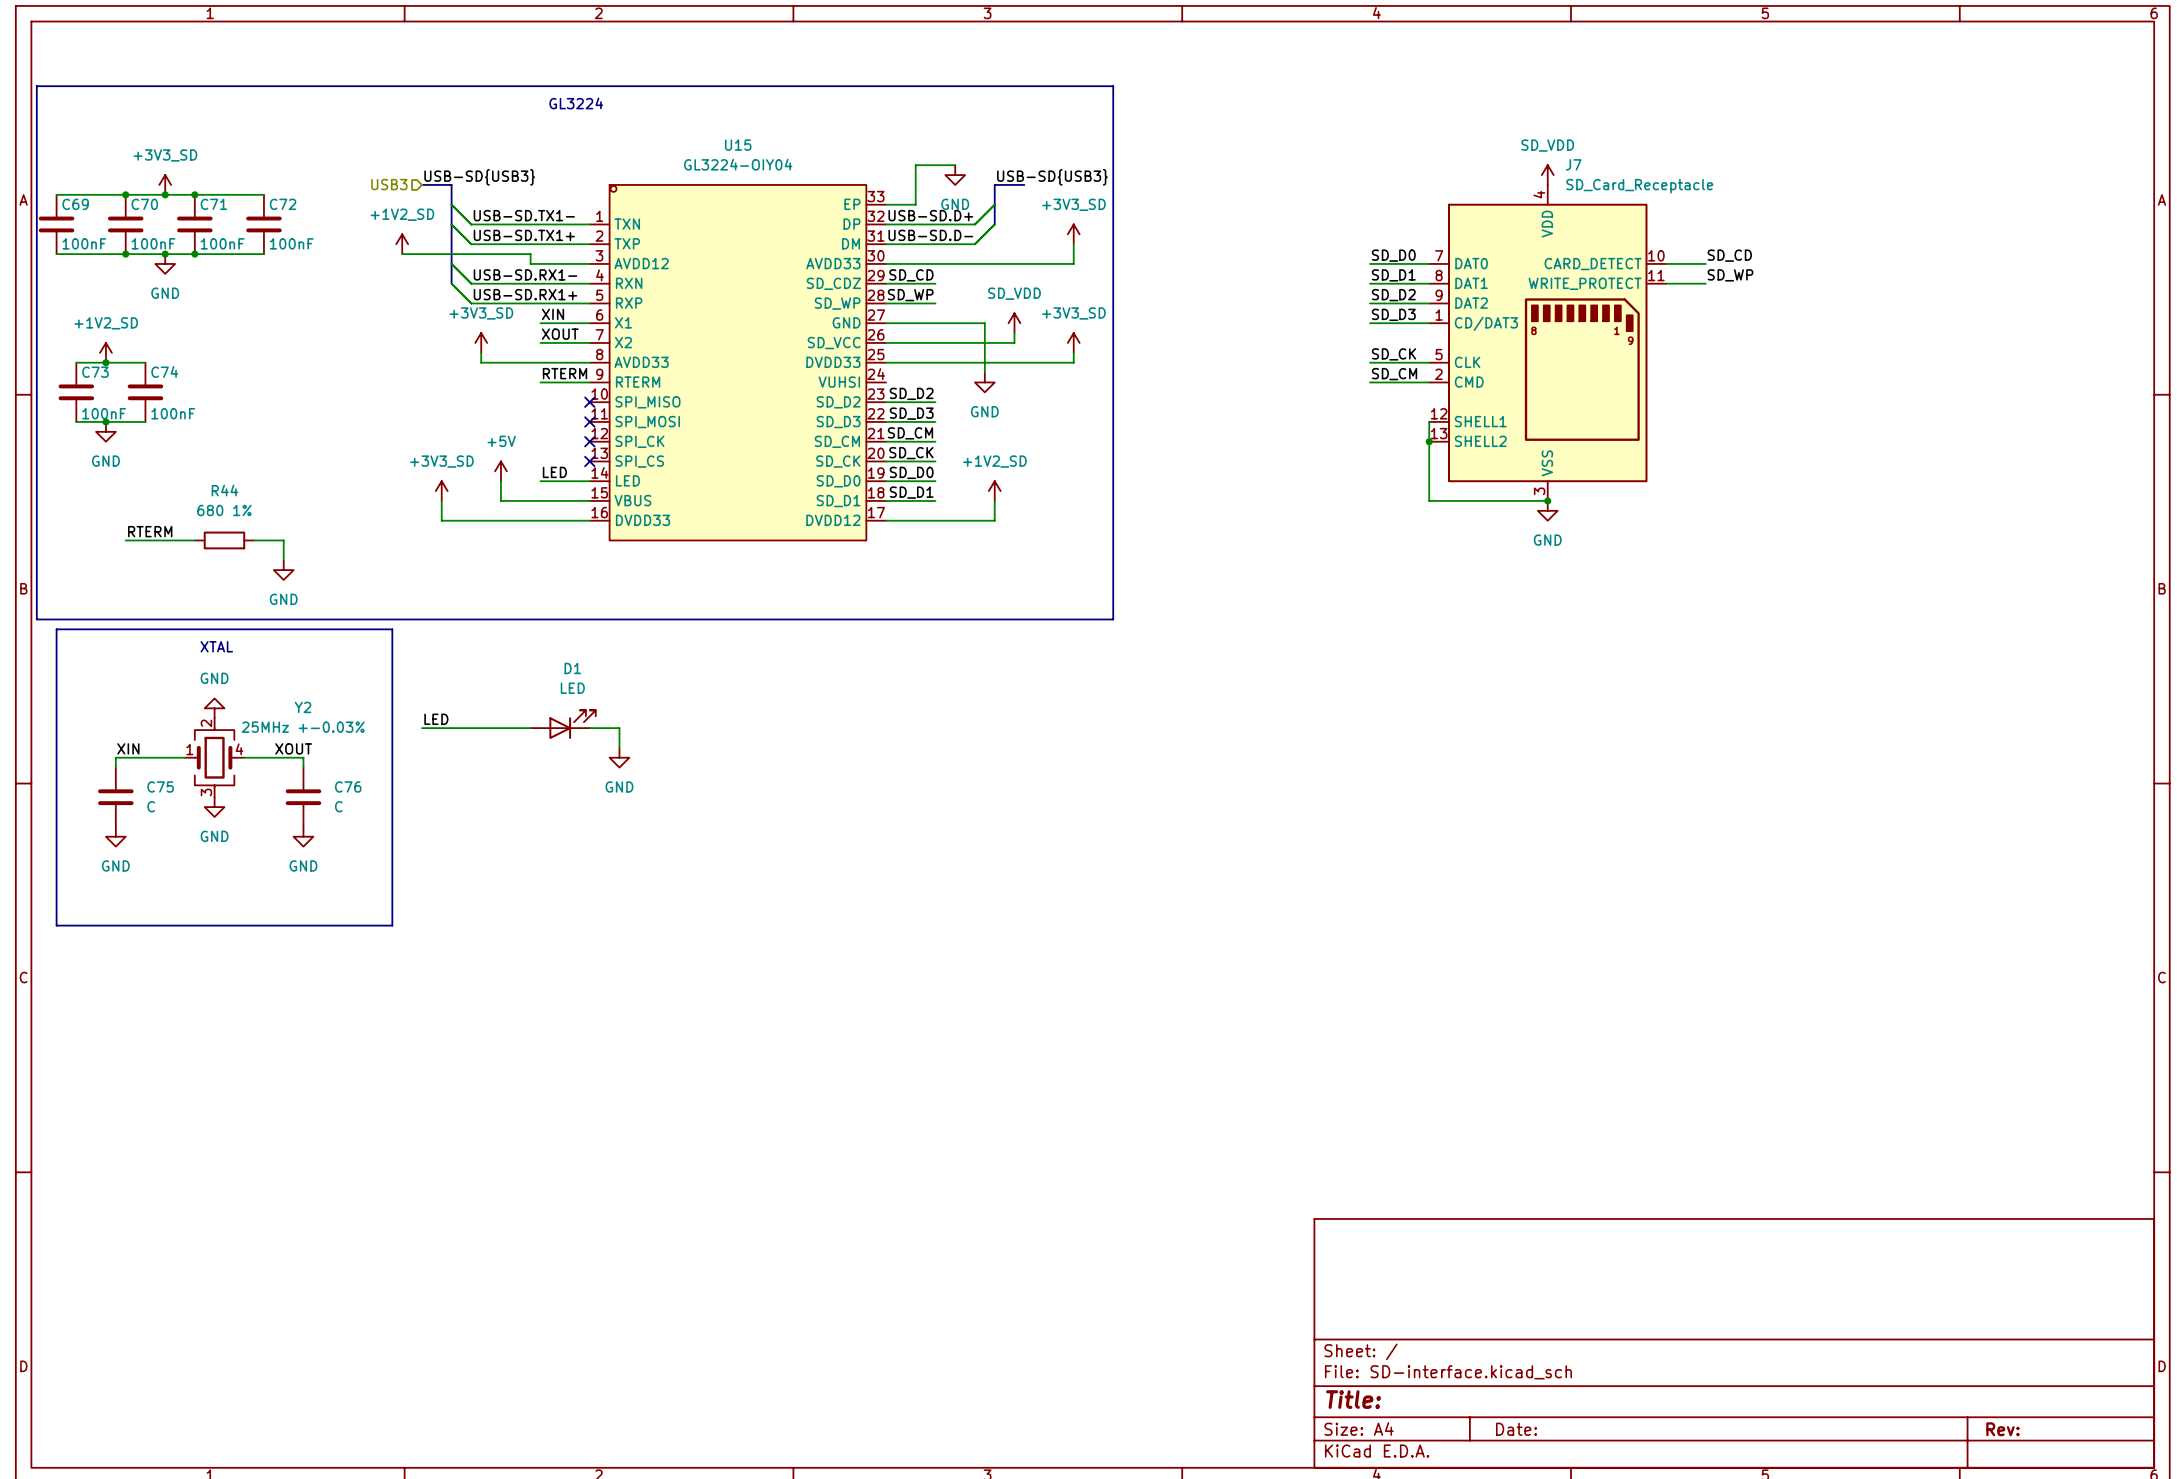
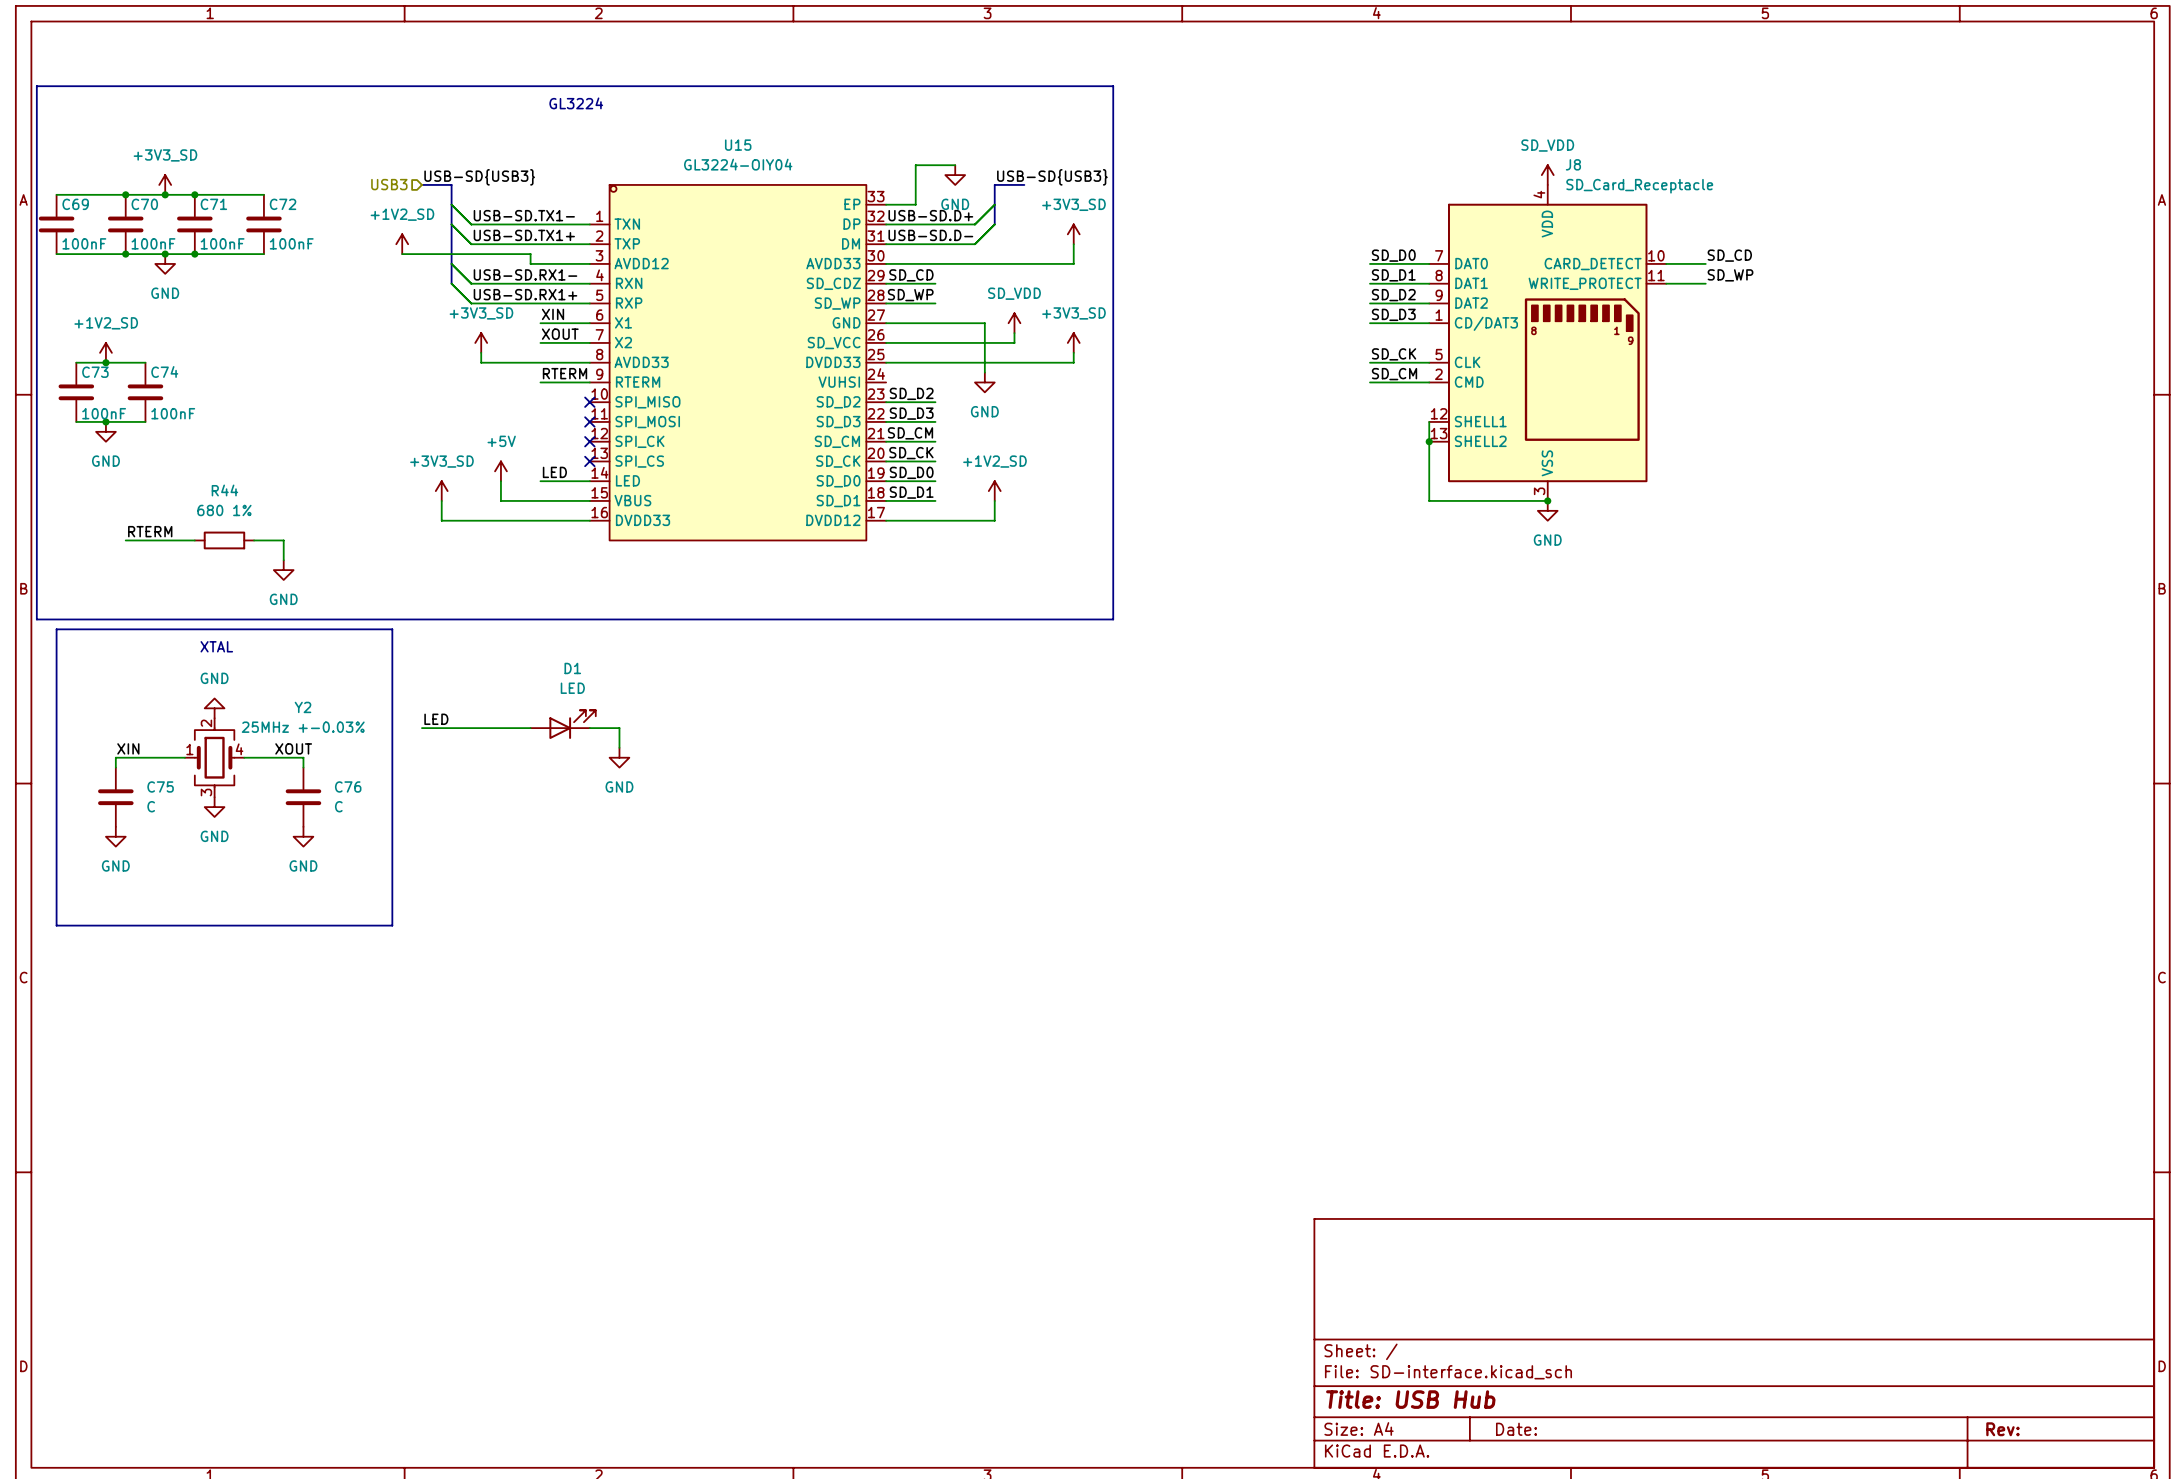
J7 name: J7 (1573, 164) -> J8 (1573, 164)
title block: Title: (1353, 1399) -> Title: USB Hub (1410, 1399)

